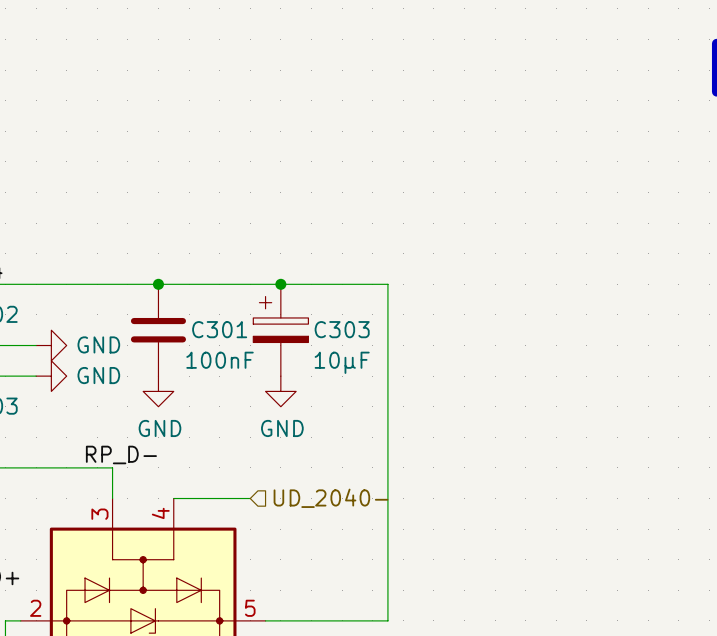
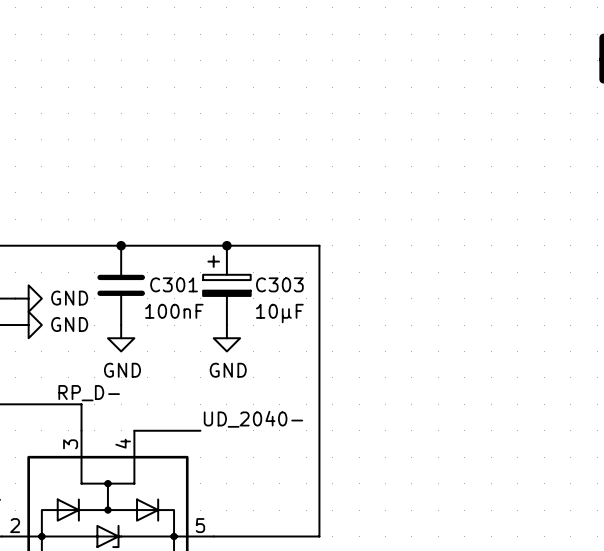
label: none -> UD_2040- (253, 419)
hierarchical label: UD_2040- (331, 498) -> none

